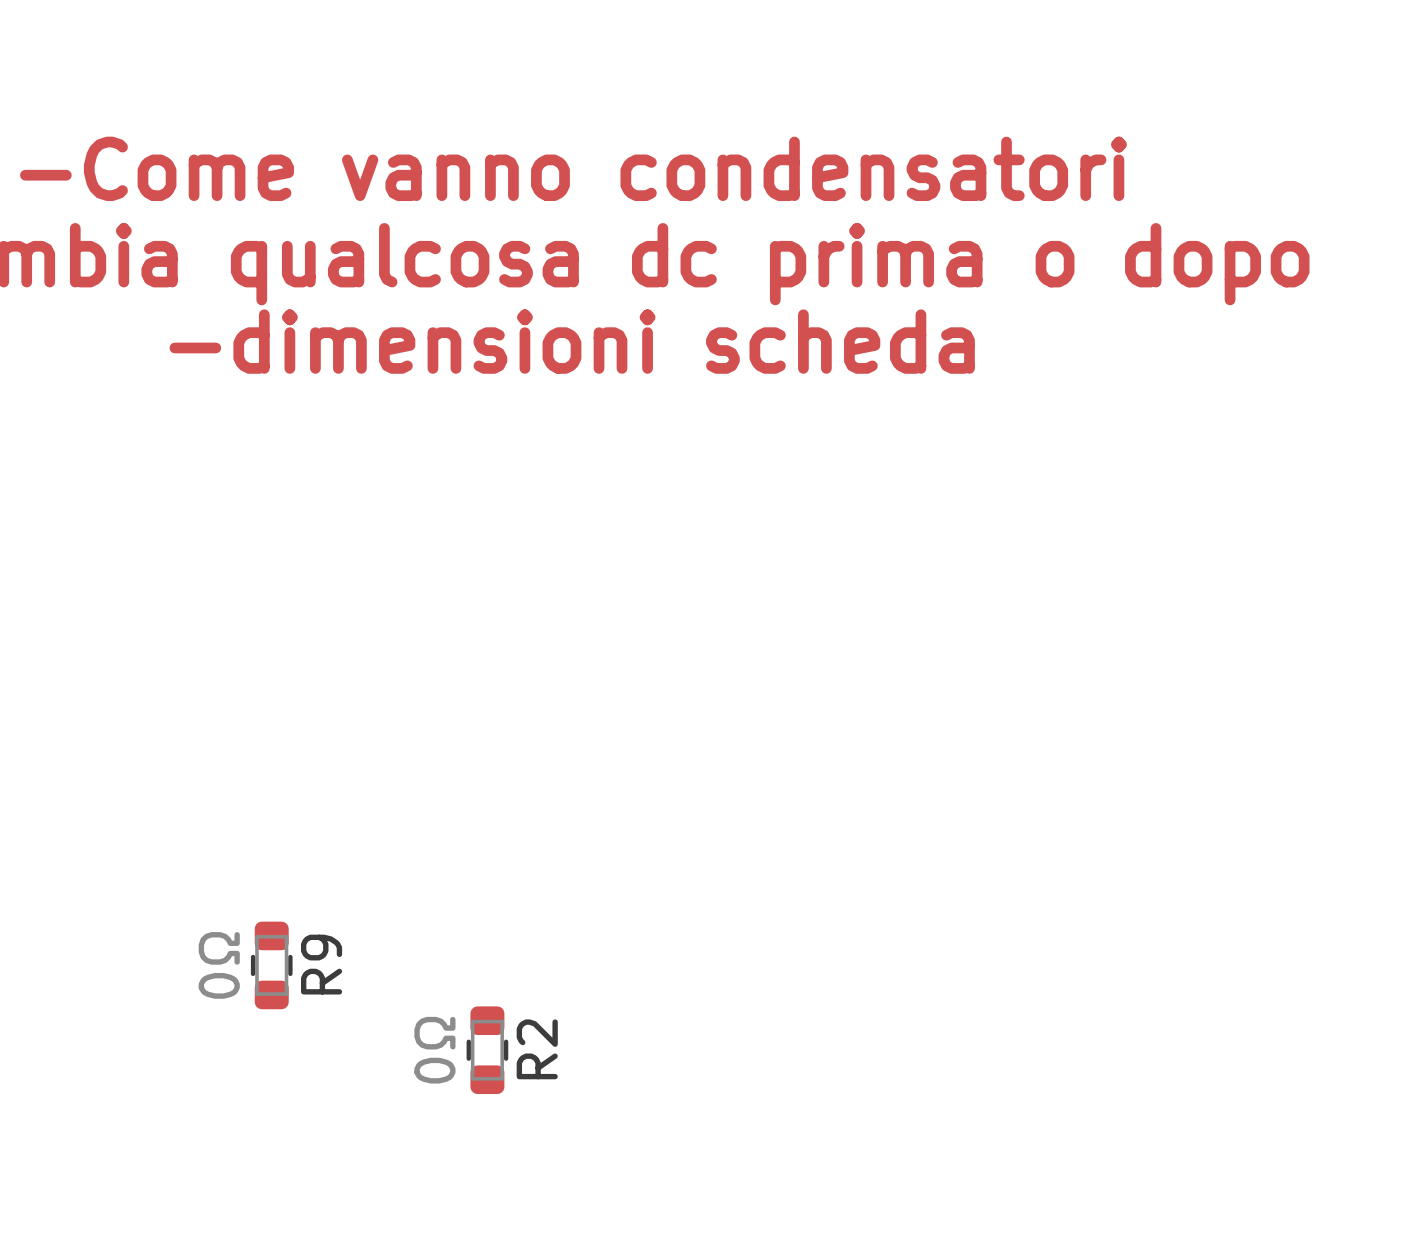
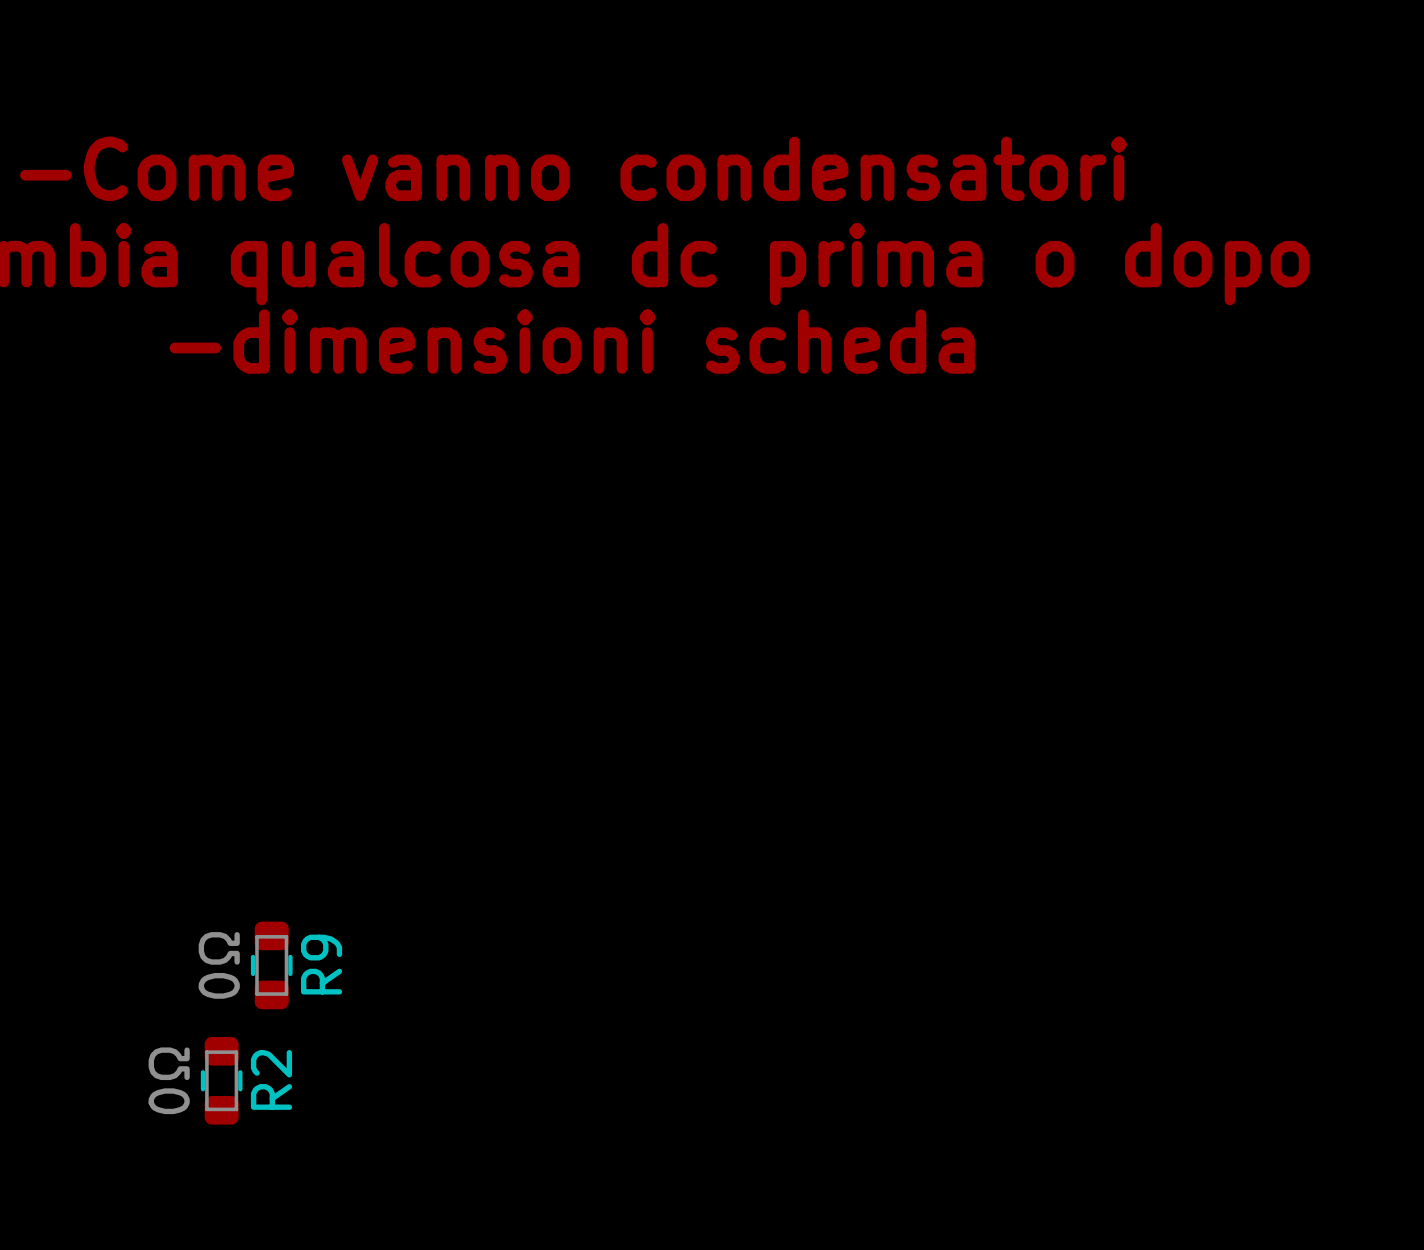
R2 position: (487, 1050) -> (221, 1080)

